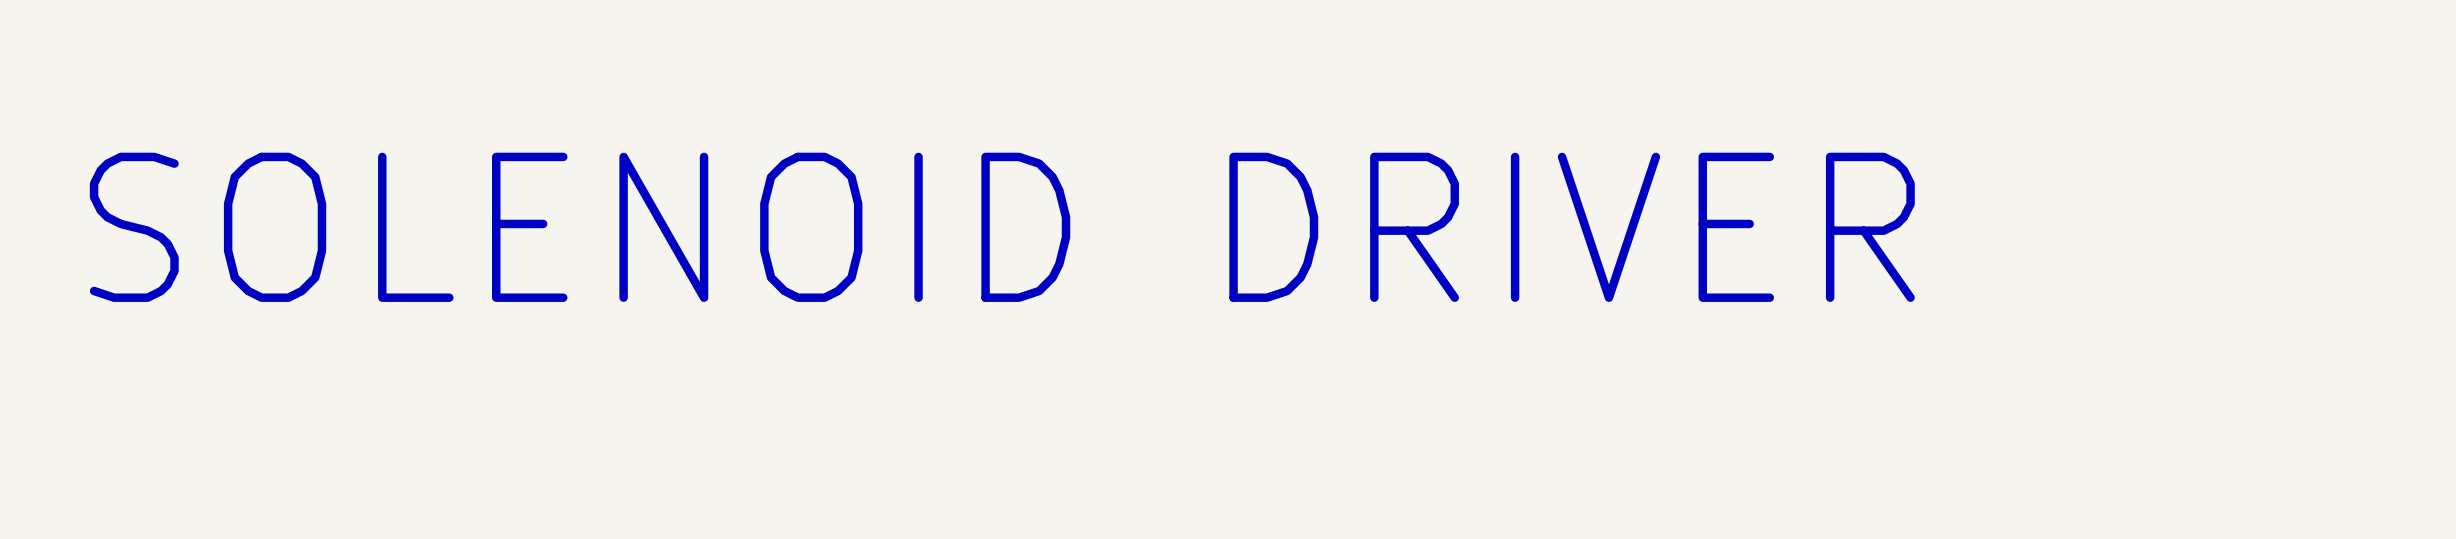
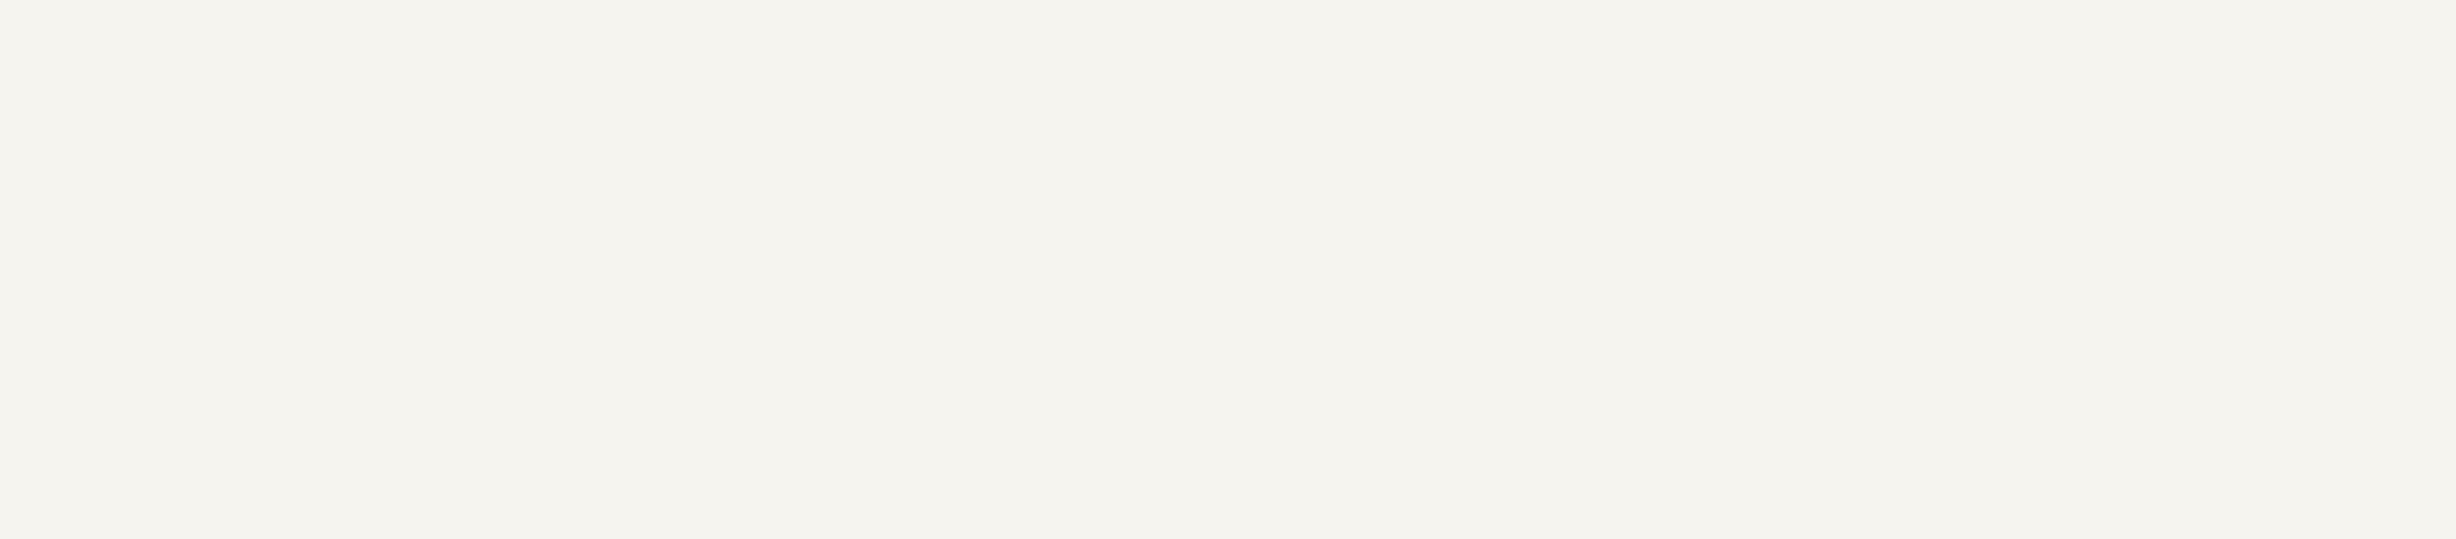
text: SOLENOID DRIVER (1002, 227) -> none

